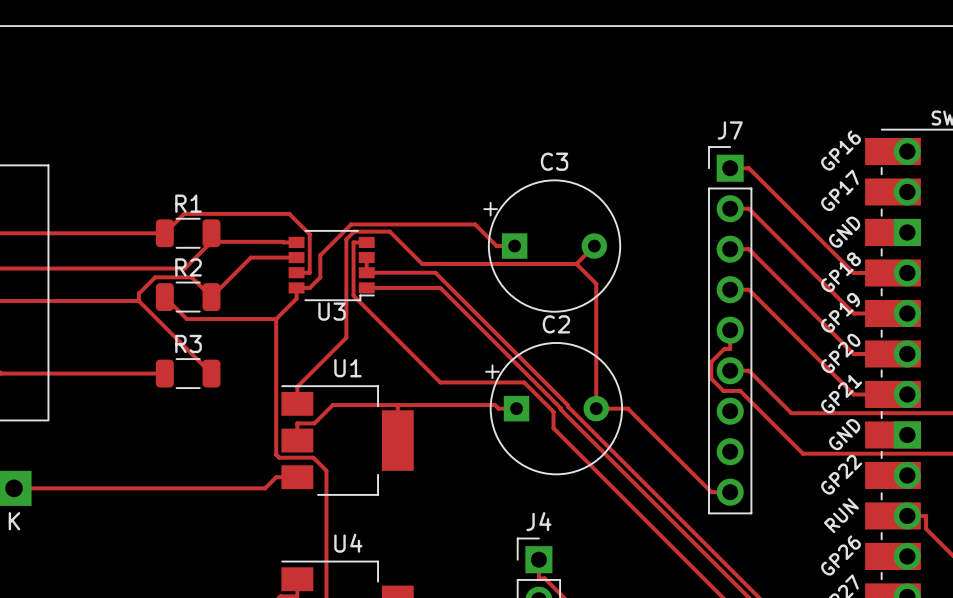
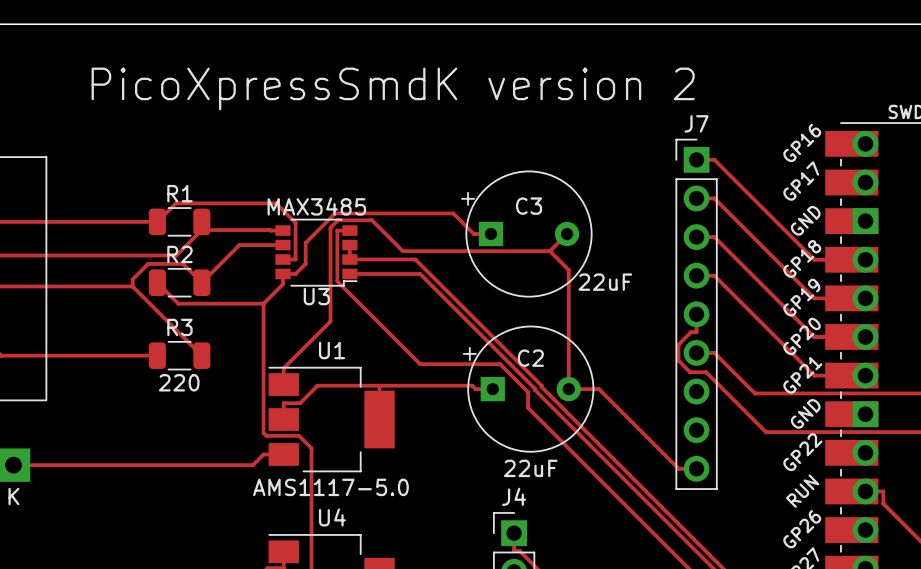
text: none -> PicoXpressSmdK version 2 (393, 88)
C3 name position: C3 (554, 161) -> C3 (529, 206)
U3 value: none -> MAX3485 (316, 206)
C3 value: none -> 22uF (605, 282)
C2 name position: C2 (556, 324) -> C2 (530, 358)
R3 value: none -> 220 (179, 382)
C2 value: none -> 22uF (530, 468)
U1 value: none -> AMS1117-5.0 (330, 487)

